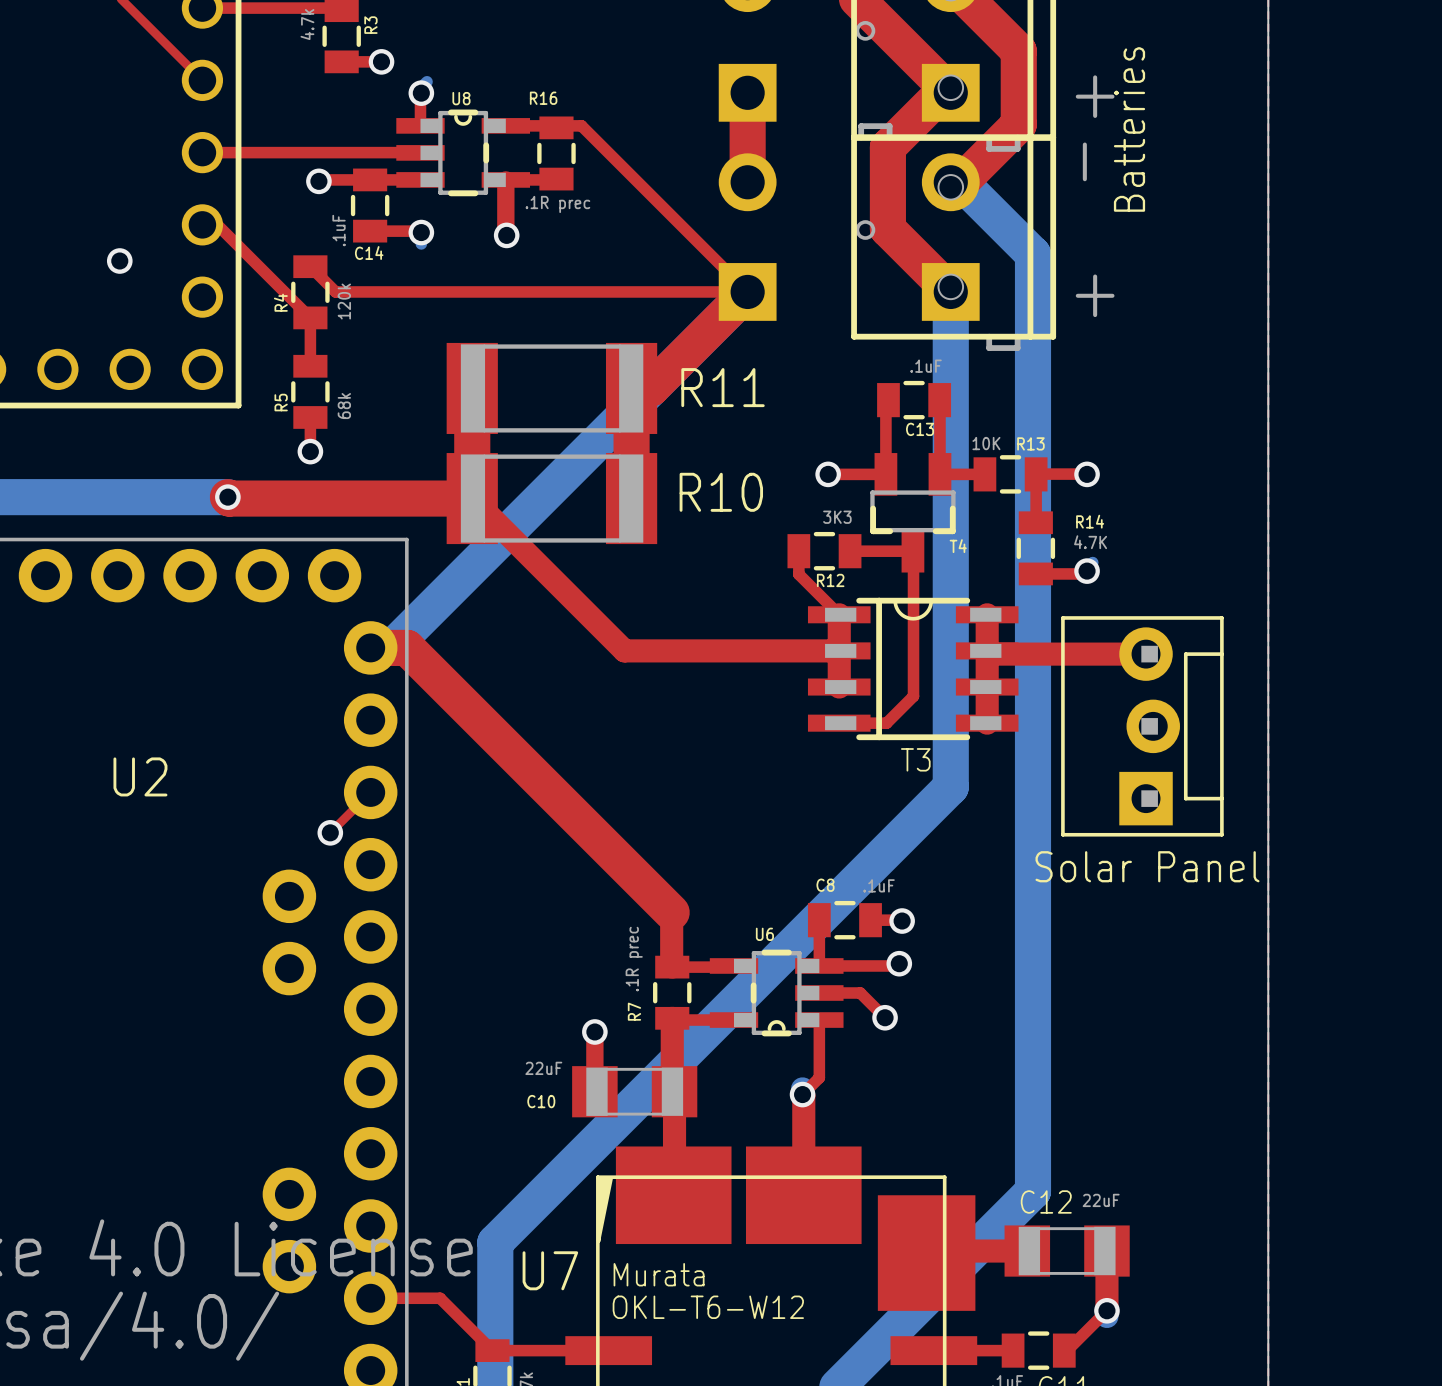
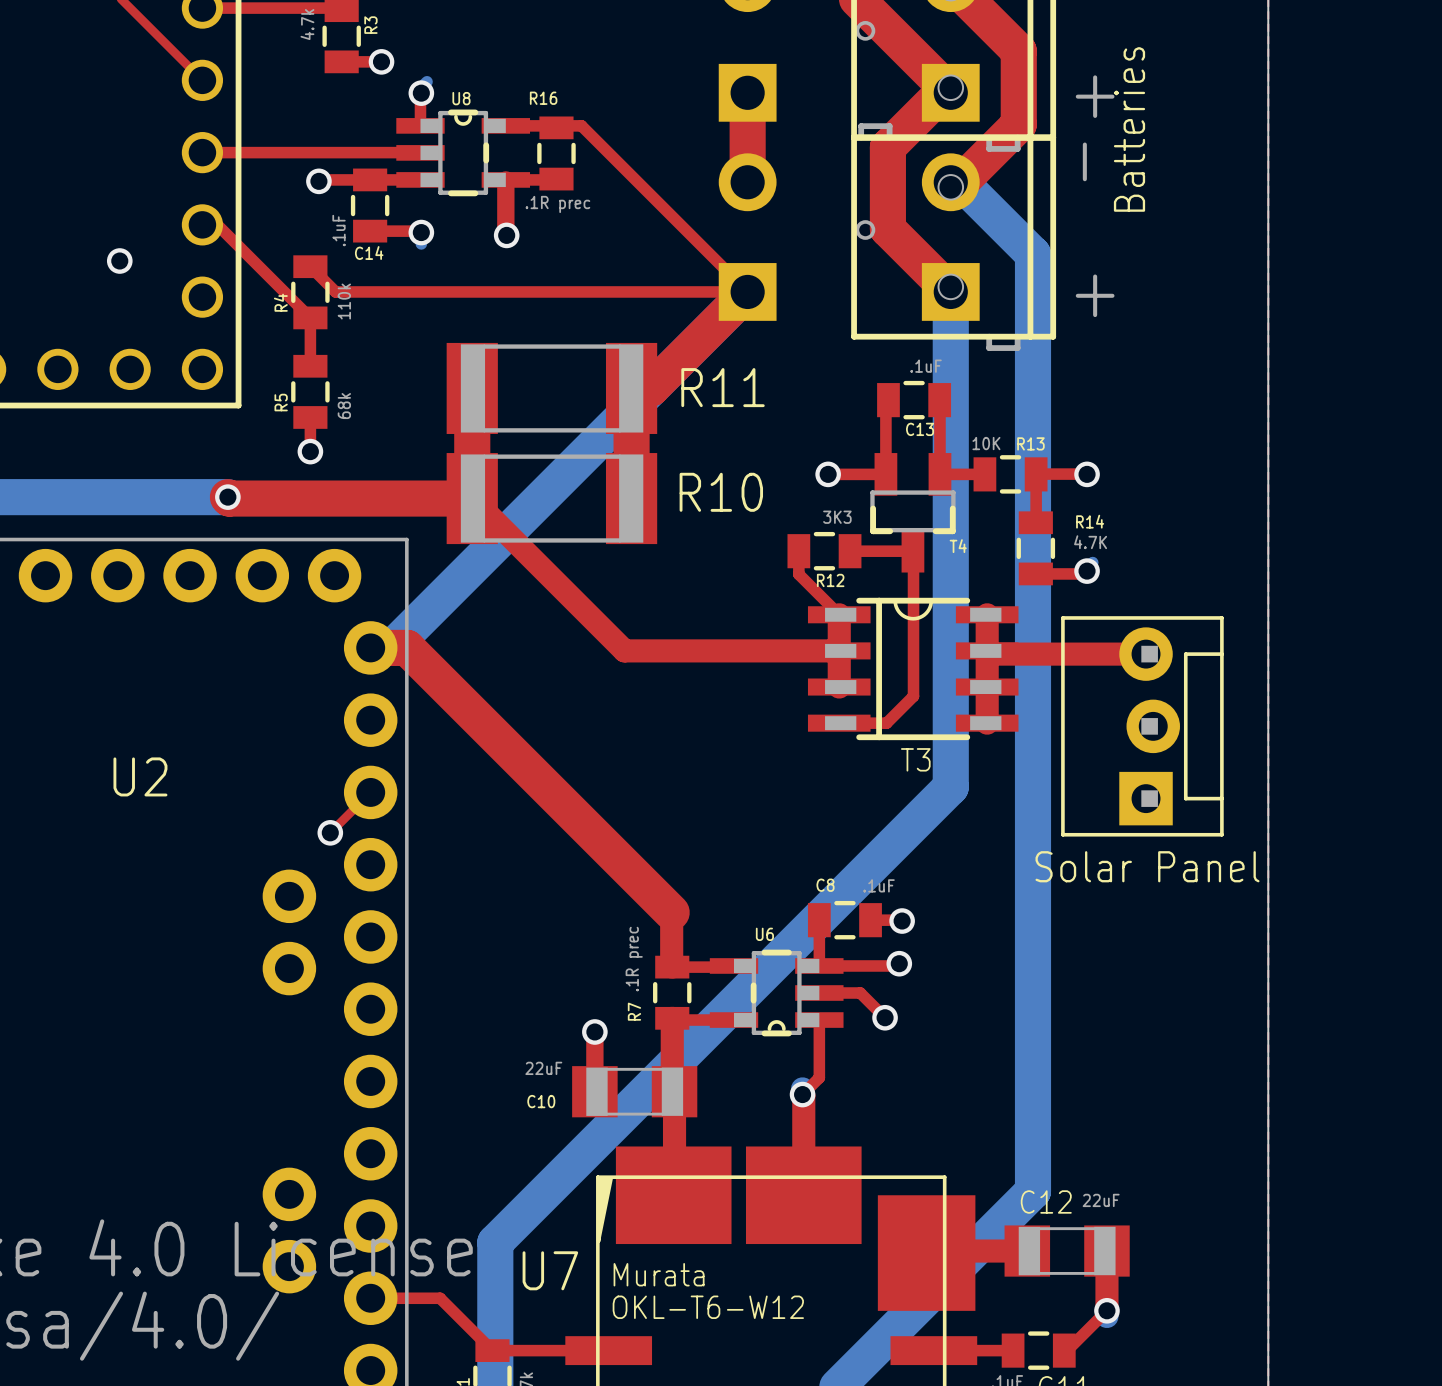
R4 value: 120k (344, 301) -> 110k (344, 301)

